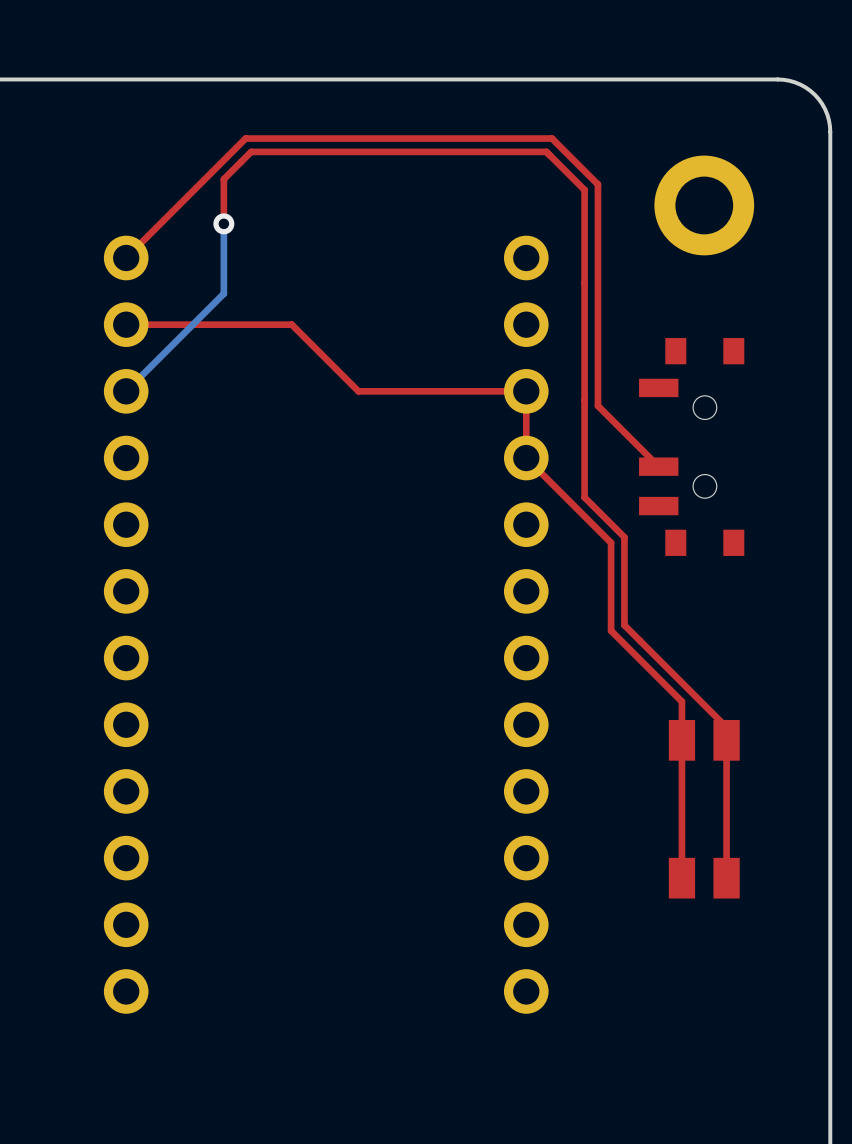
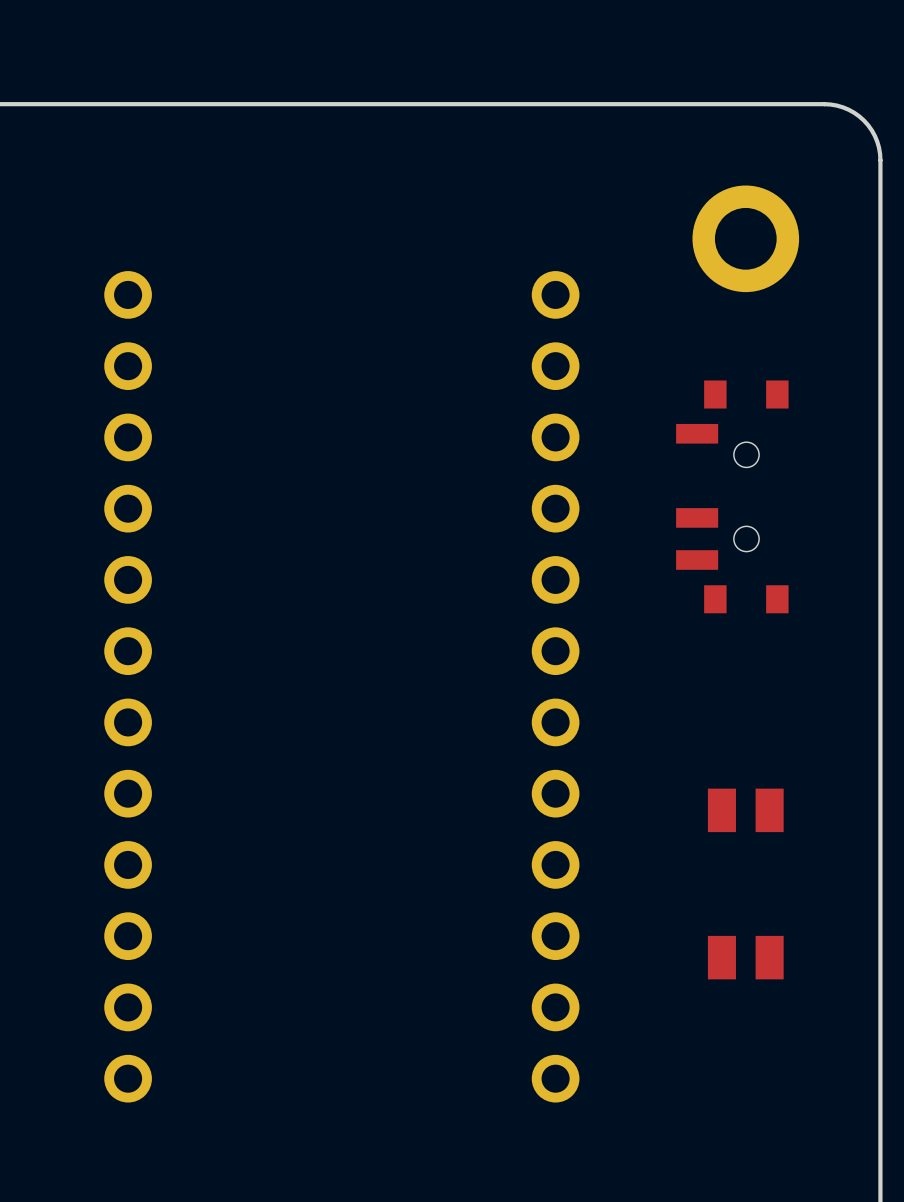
top track: (223, 223) (223, 179) (251, 151) (546, 151) (584, 190) (584, 497) (624, 537) (624, 625) (726, 727) (726, 878) -> none
bottom track: (223, 223) (223, 293) (126, 391) -> none
via: (223, 223) -> none
top track: (126, 257) (245, 138) (552, 138) (597, 184) (597, 405) (658, 466) -> none
top track: (126, 324) (291, 324) (358, 391) (526, 391) (526, 458) (611, 542) (611, 630) (681, 701) (681, 878) -> none

